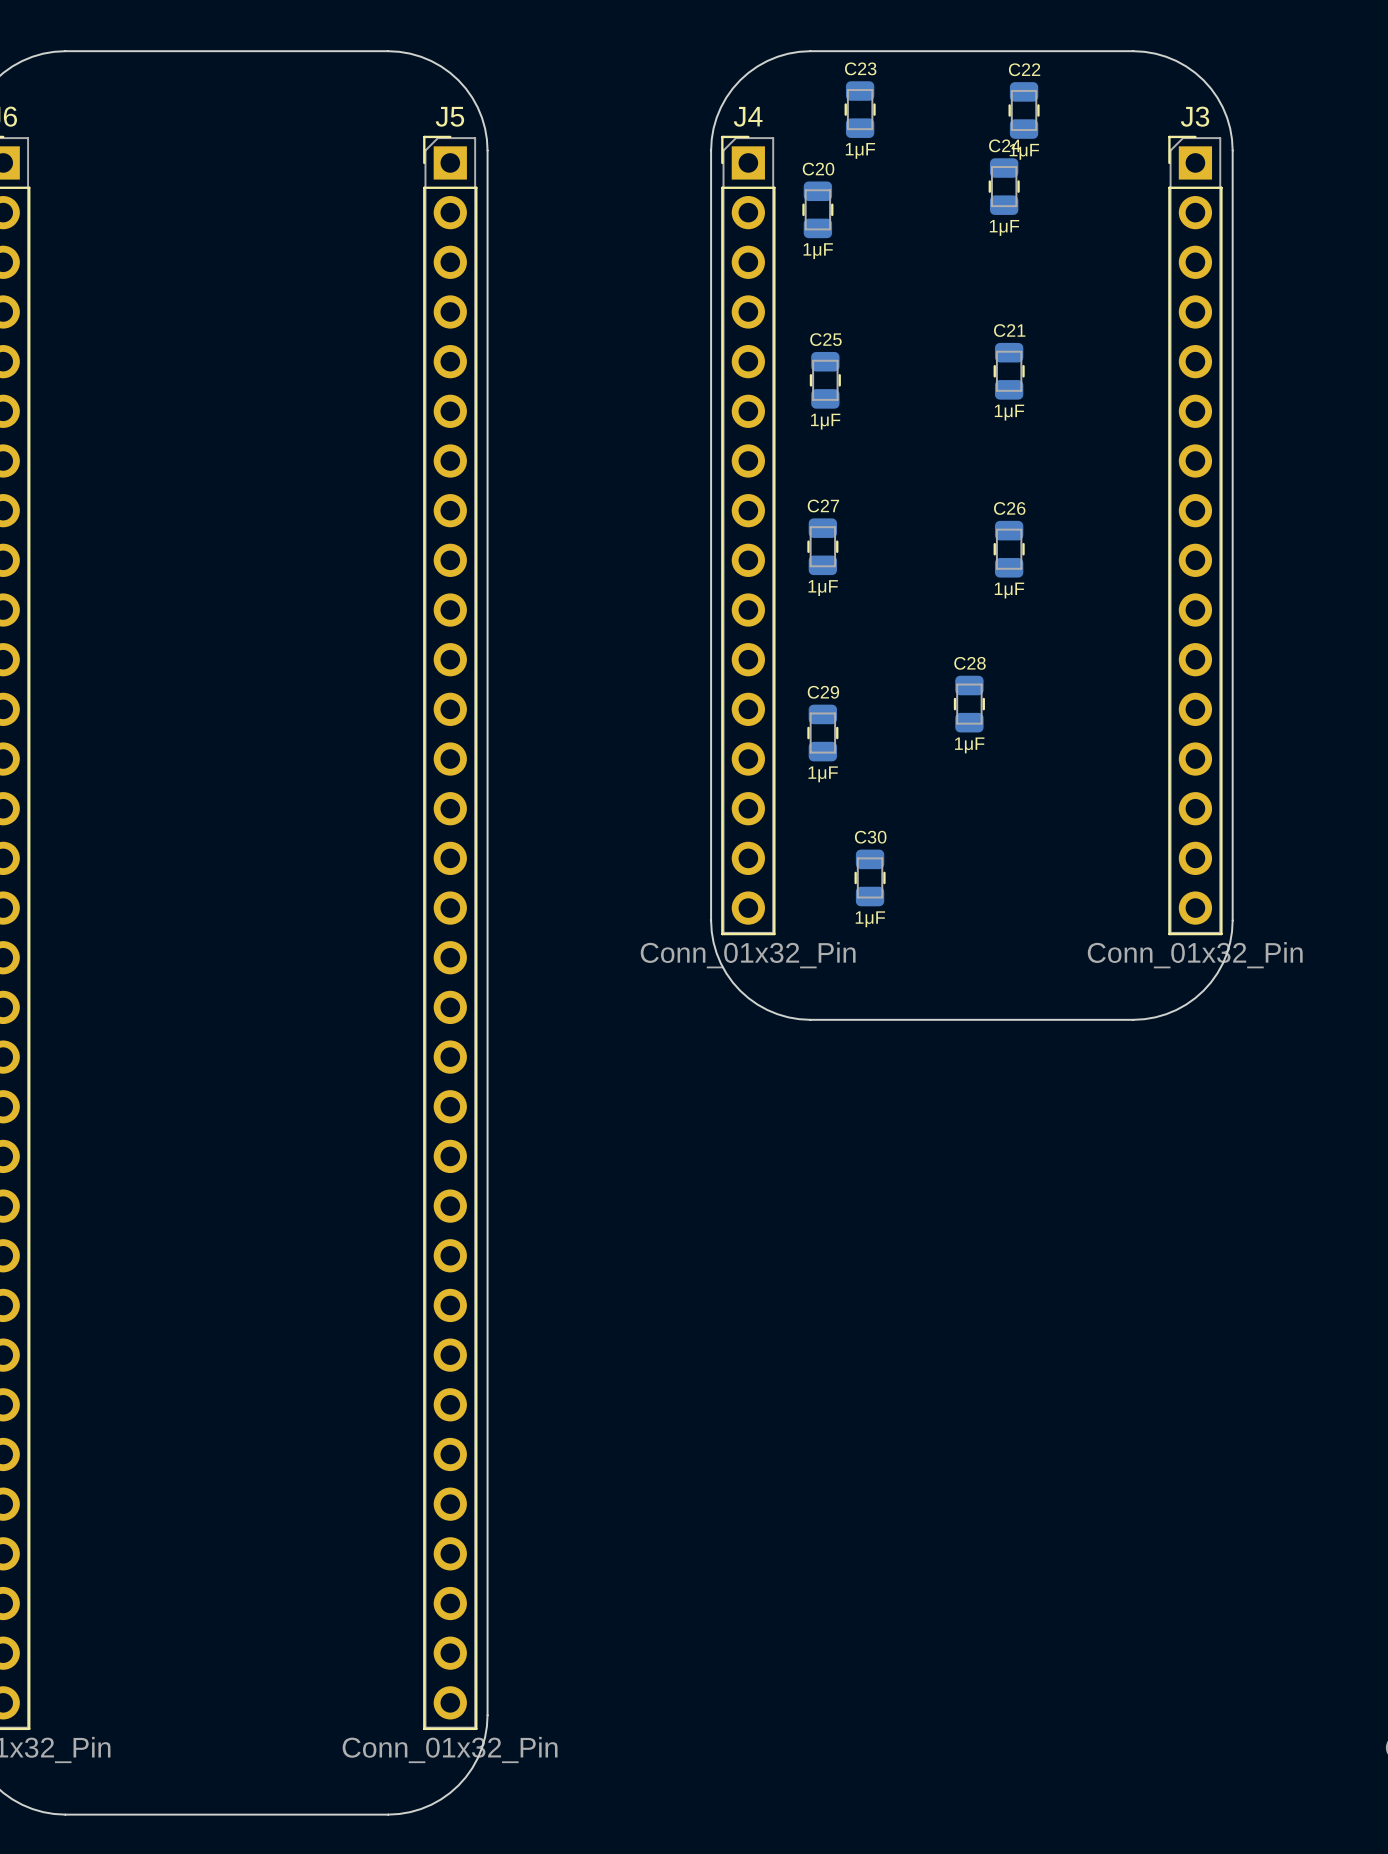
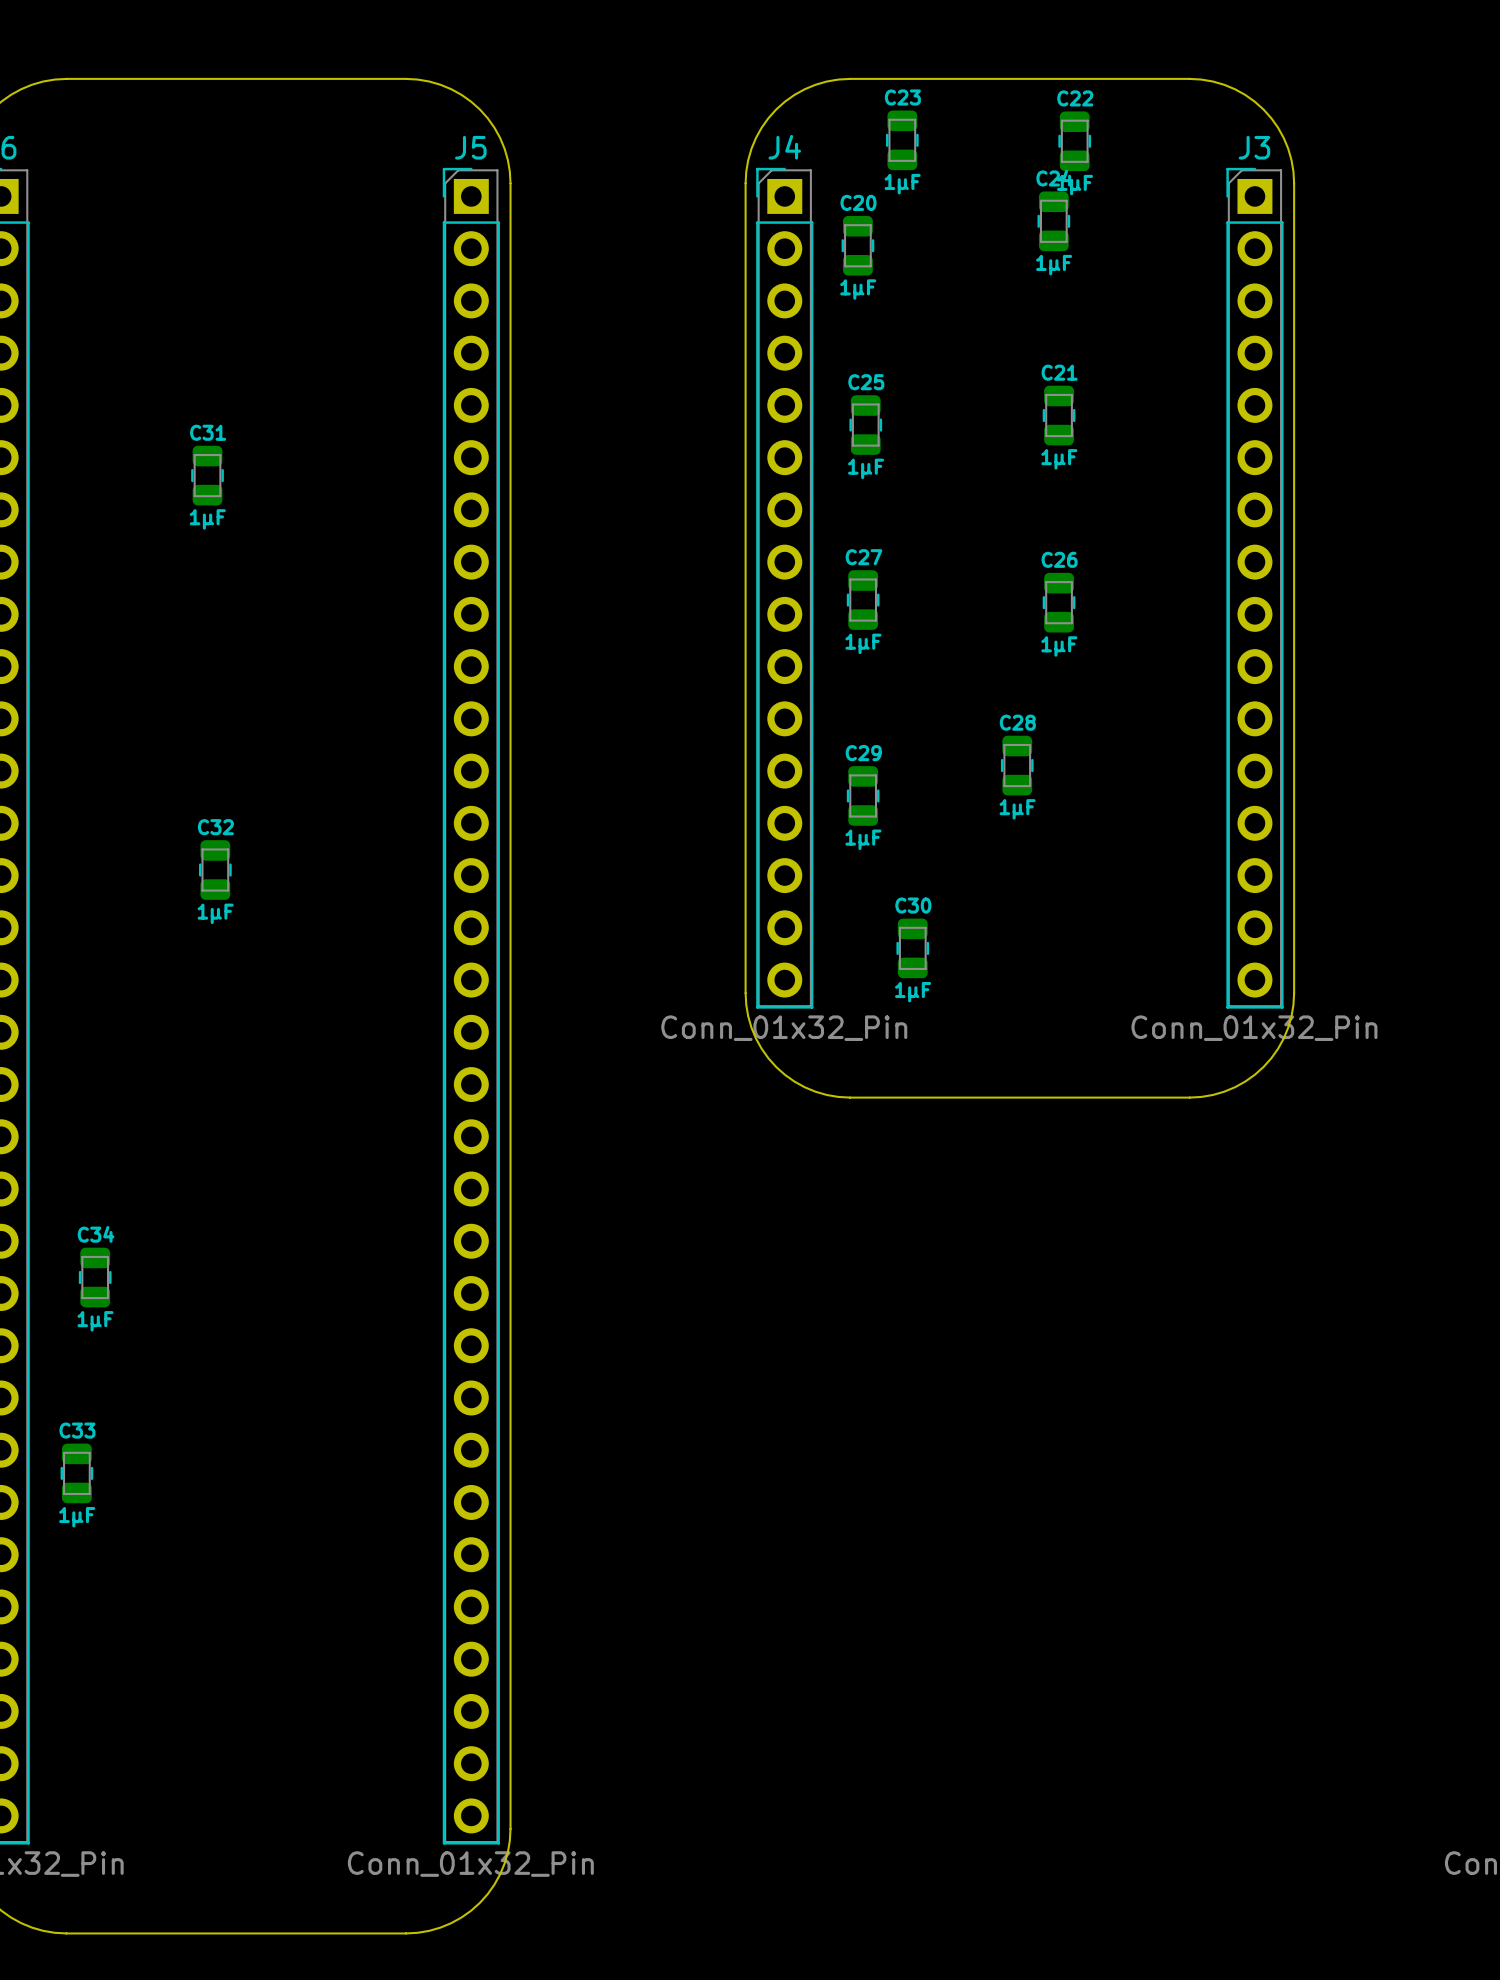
C31: none -> 1μF (207, 475)
C32: none -> 1μF (215, 870)
C34: none -> 1μF (95, 1277)
C33: none -> 1μF (76, 1473)

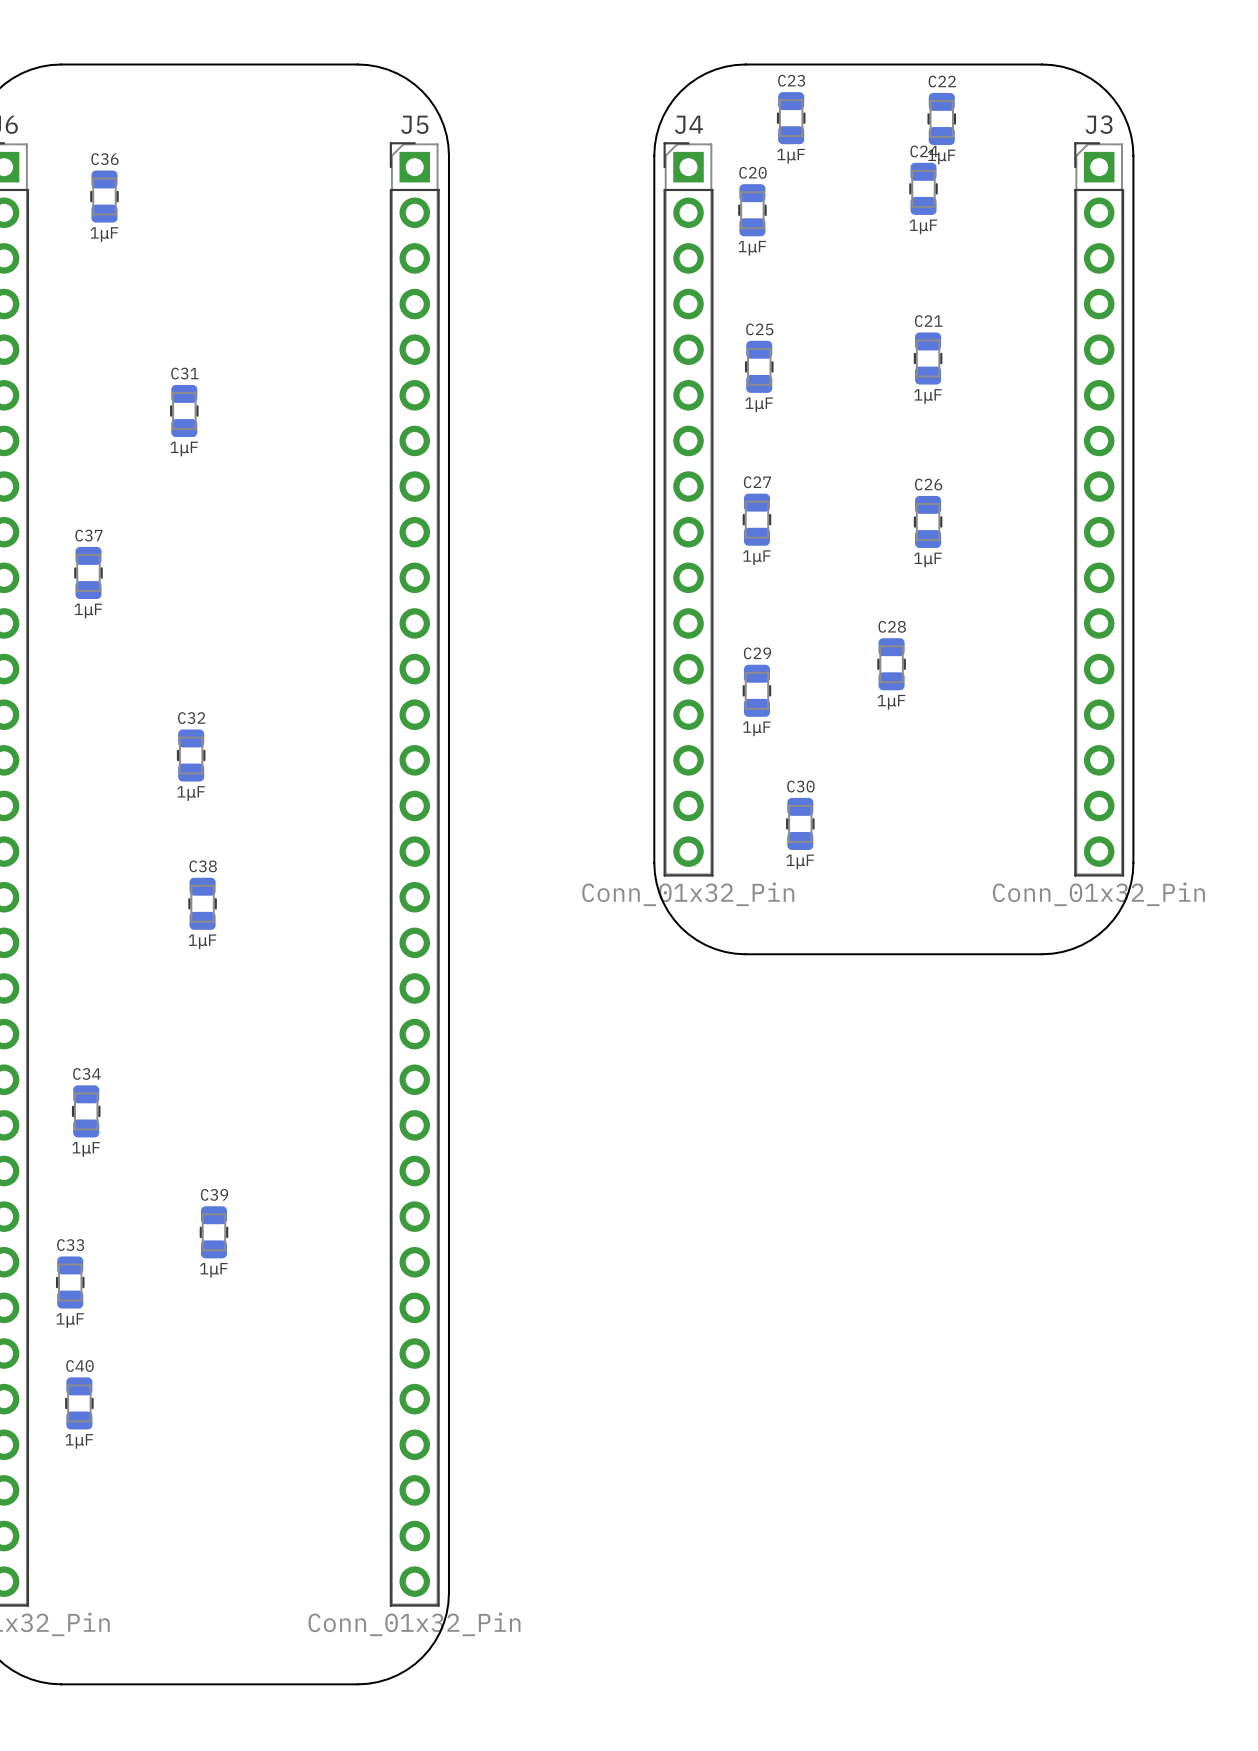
C36: none -> 1μF (104, 196)
C37: none -> 1μF (88, 572)
C38: none -> 1μF (202, 903)
C39: none -> 1μF (213, 1232)
C40: none -> 1μF (79, 1403)

